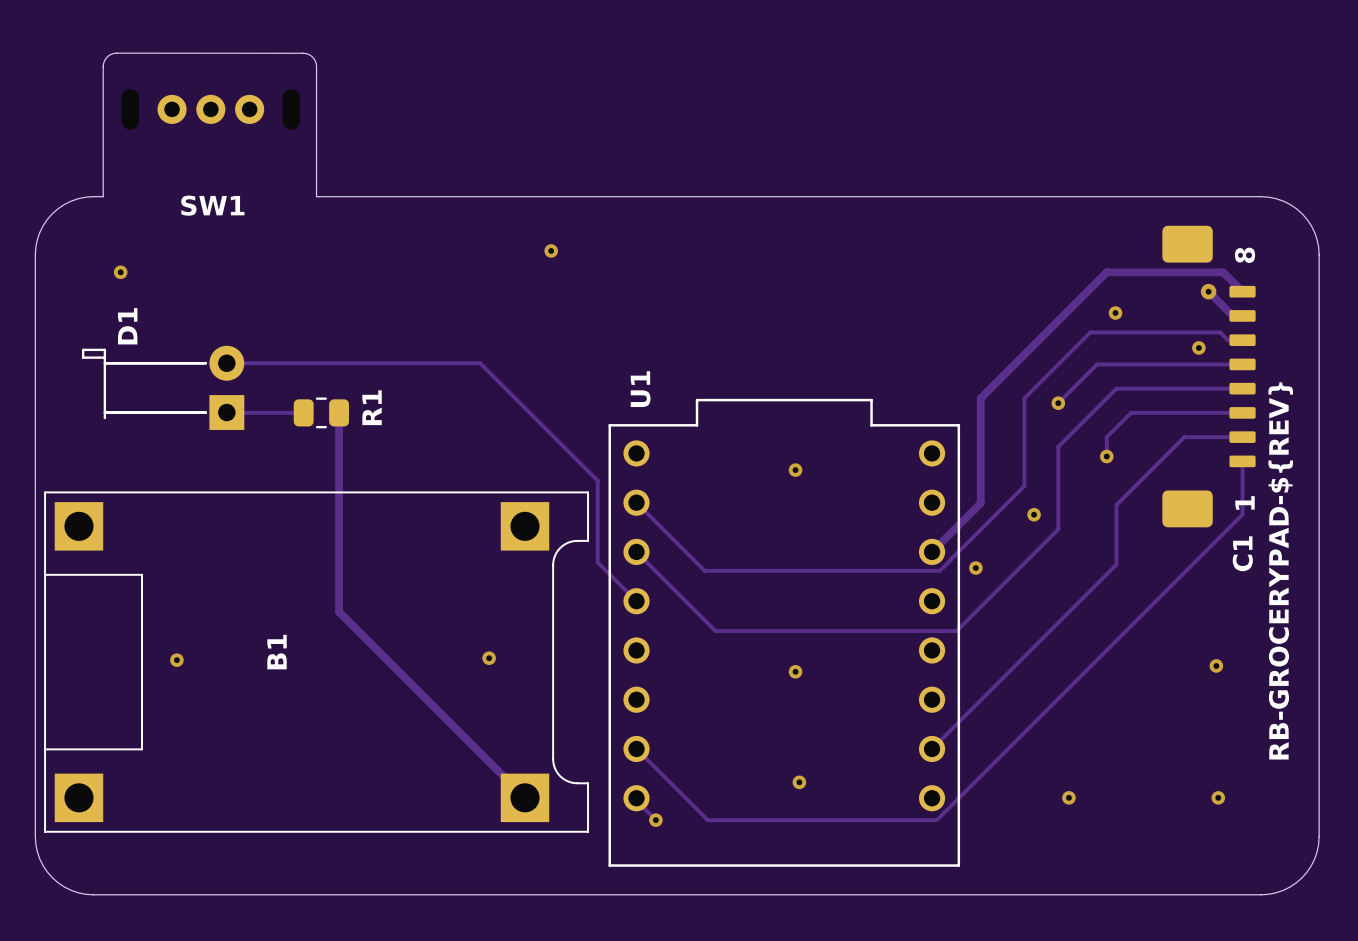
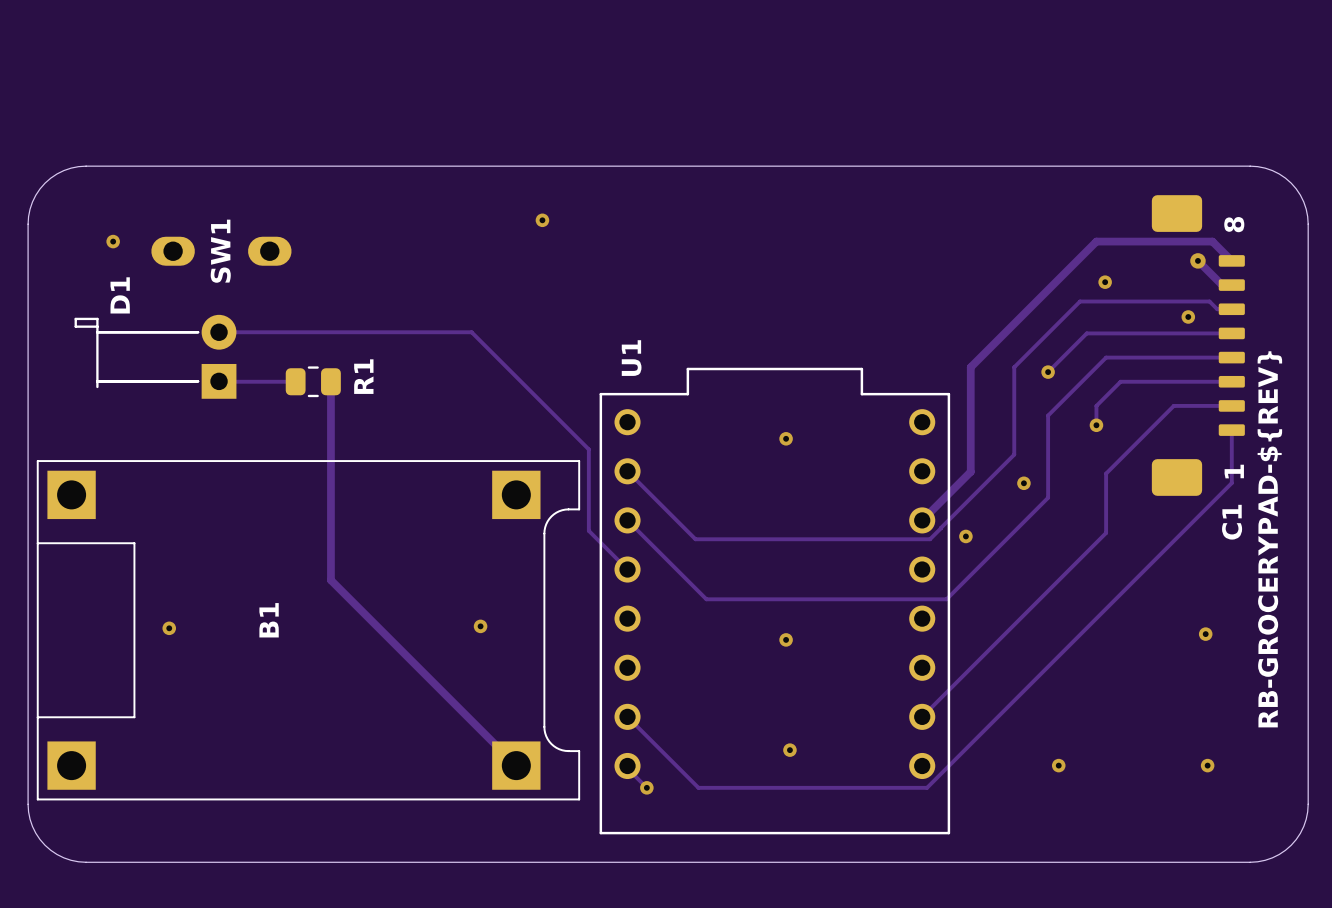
SW1 footprint: [121, 89, 301, 130] -> [151, 236, 292, 266]
board edge: (103, 196) (103, 65) (108, 56) (116, 53) (303, 53) (311, 56) (316, 66) (316, 196) -> (95, 166) (308, 166)
SW1 name position: SW1 (212, 205) -> SW1 (220, 251)

